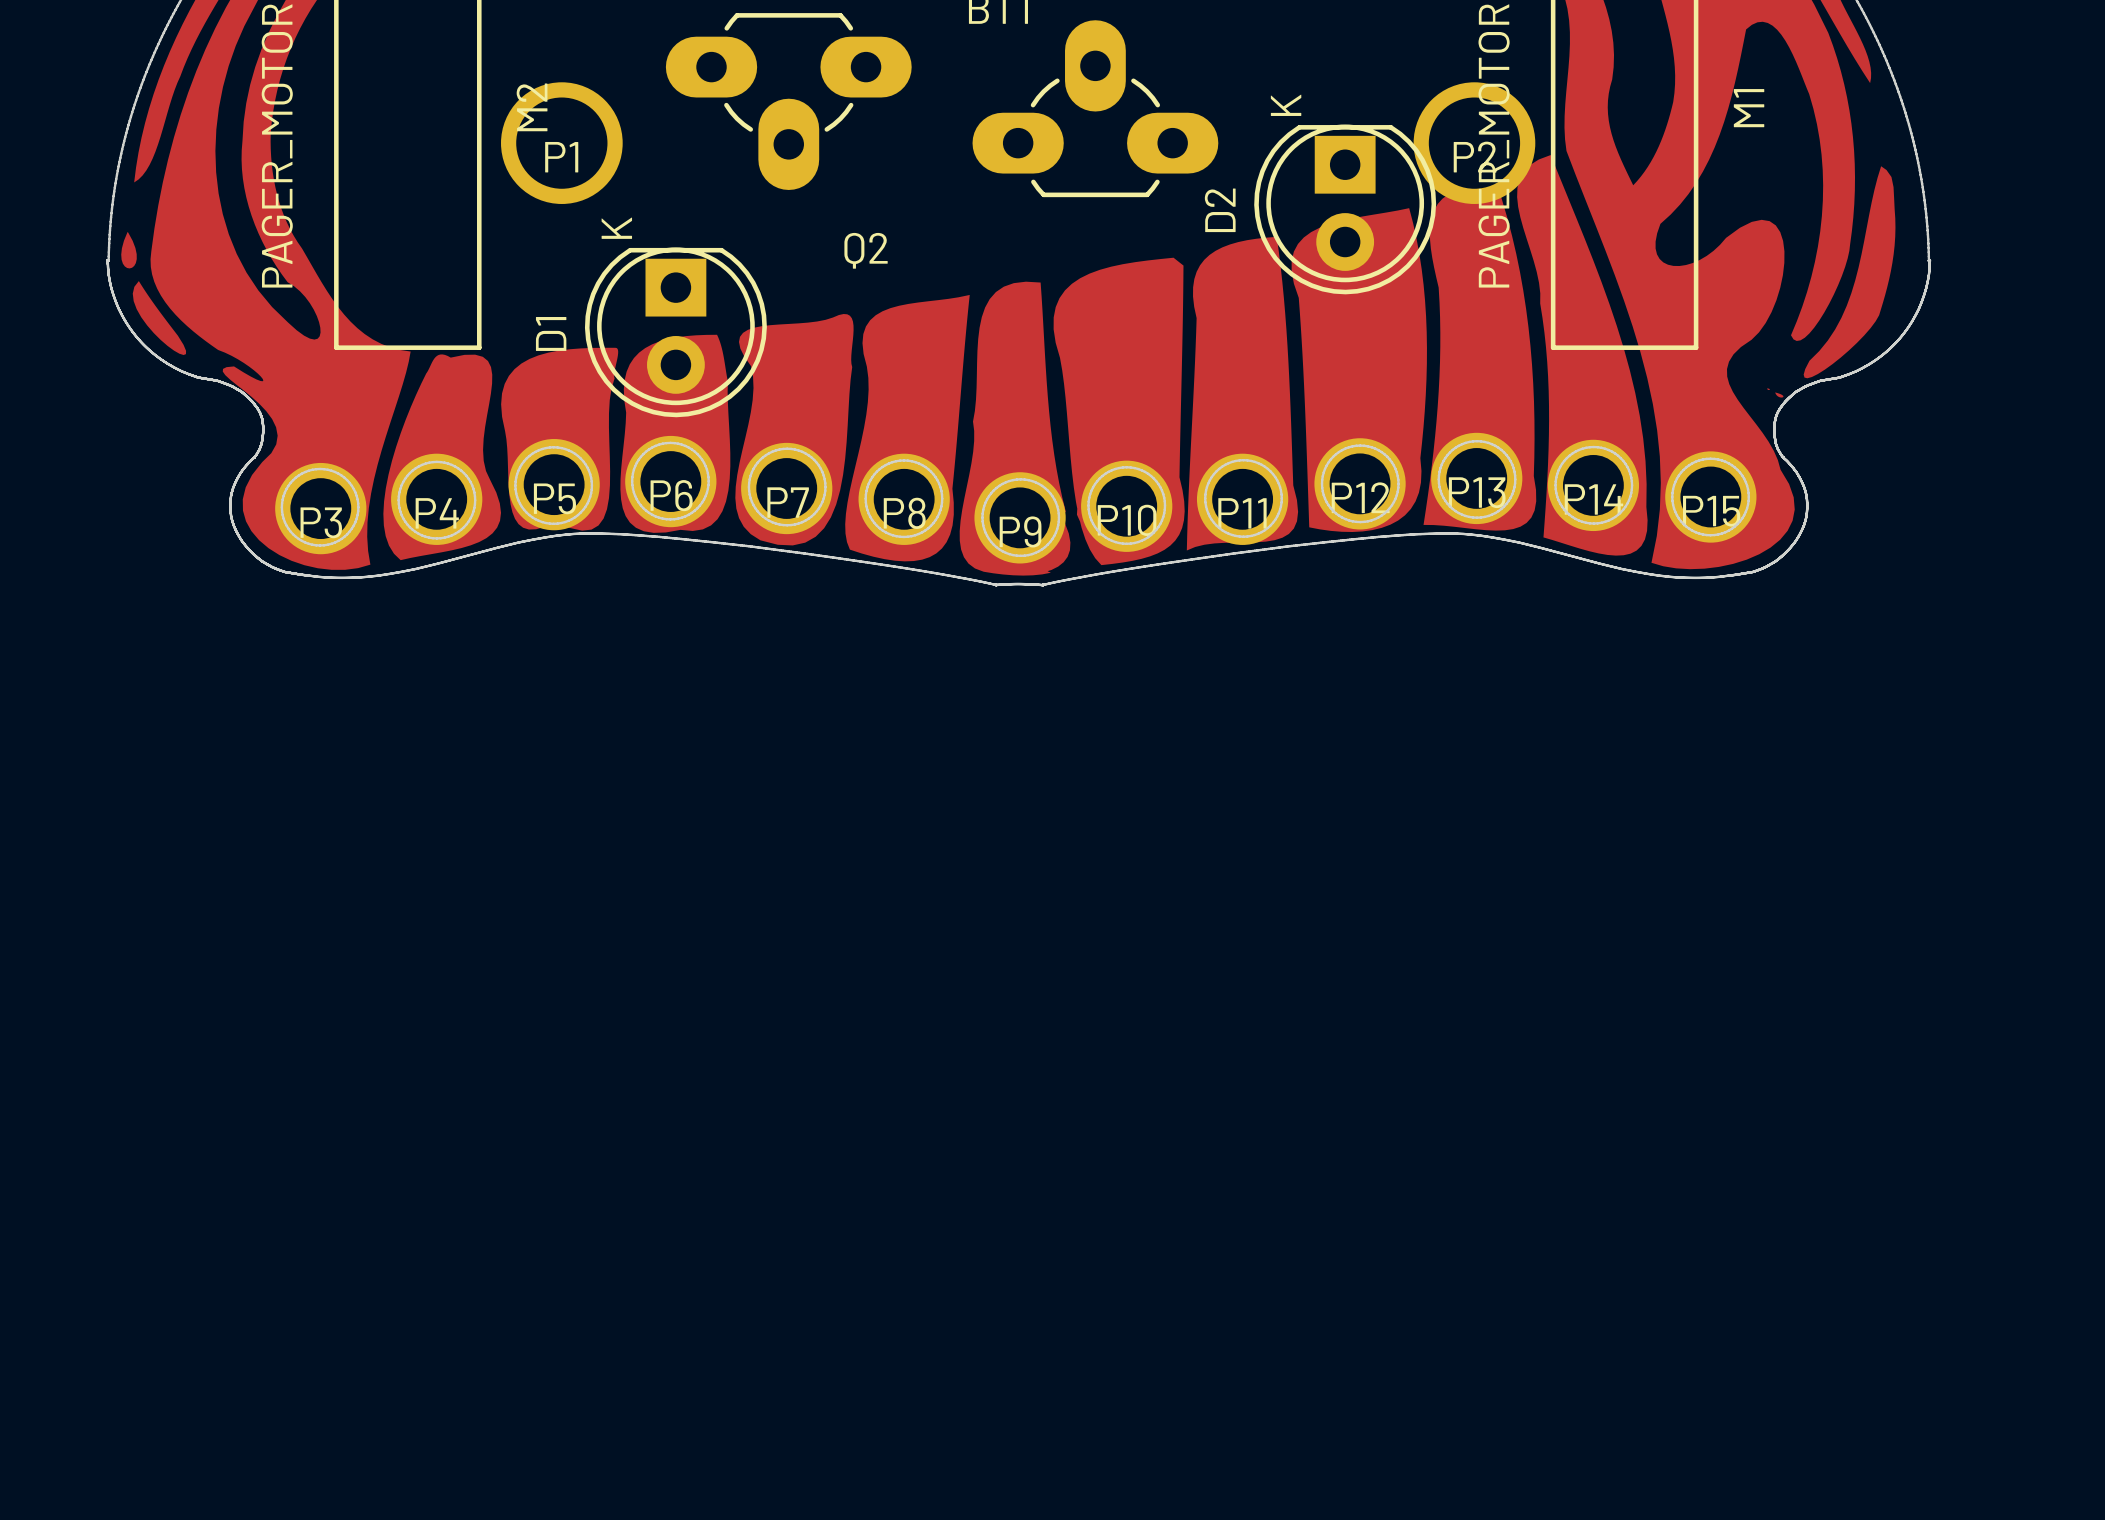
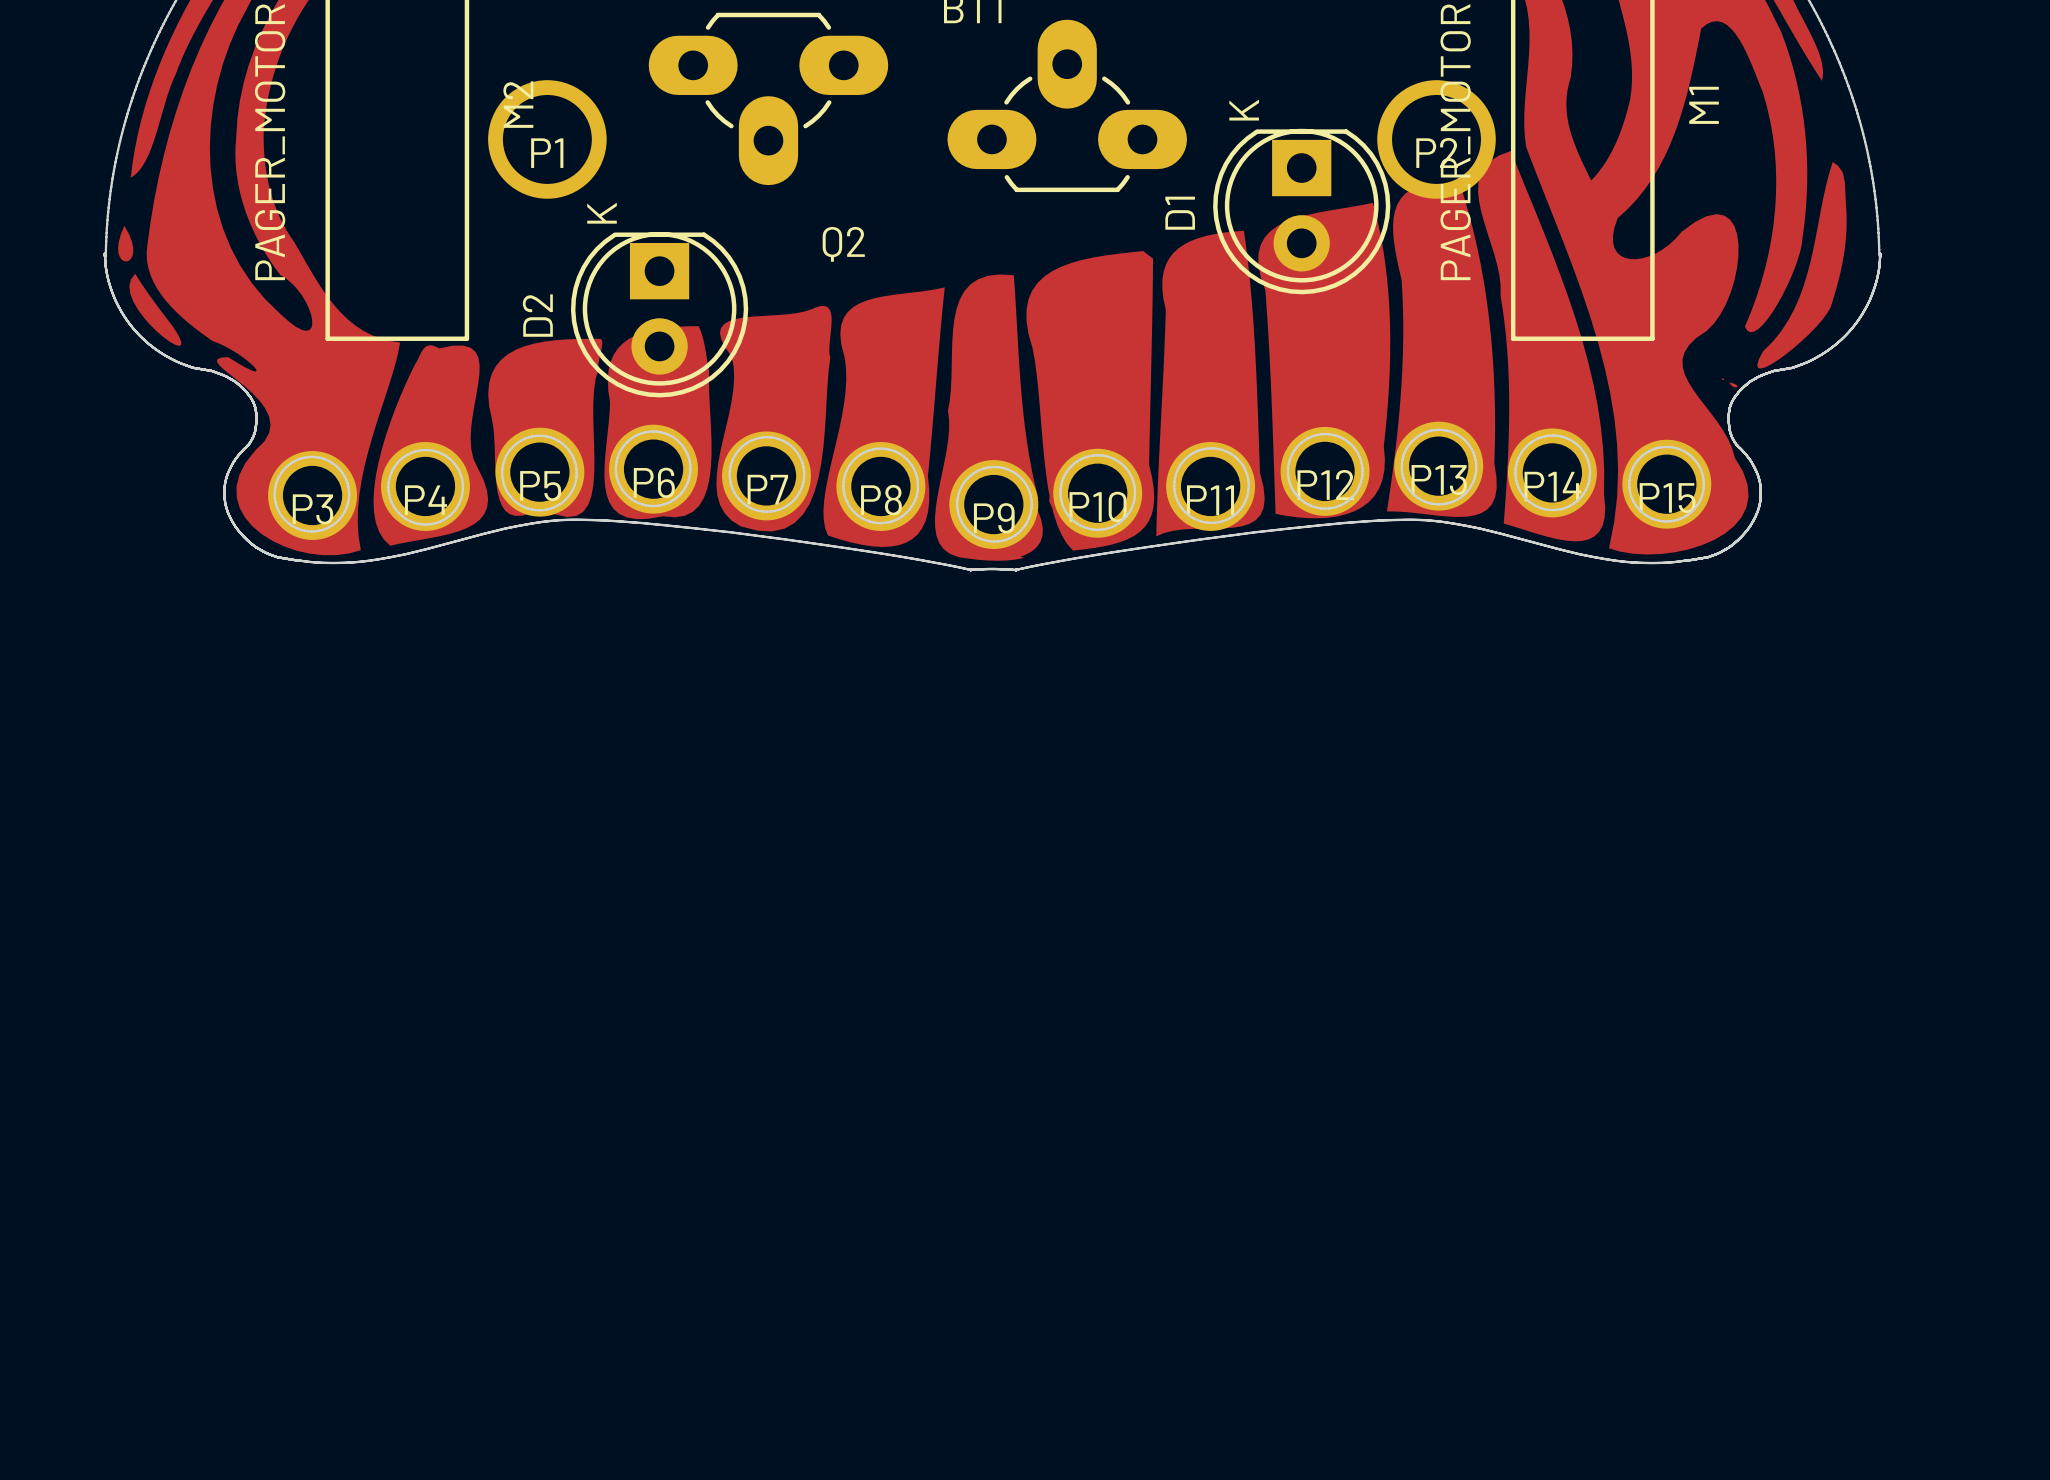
D2 position: (1345, 209) -> (659, 314)
D1 position: (675, 332) -> (1301, 211)

